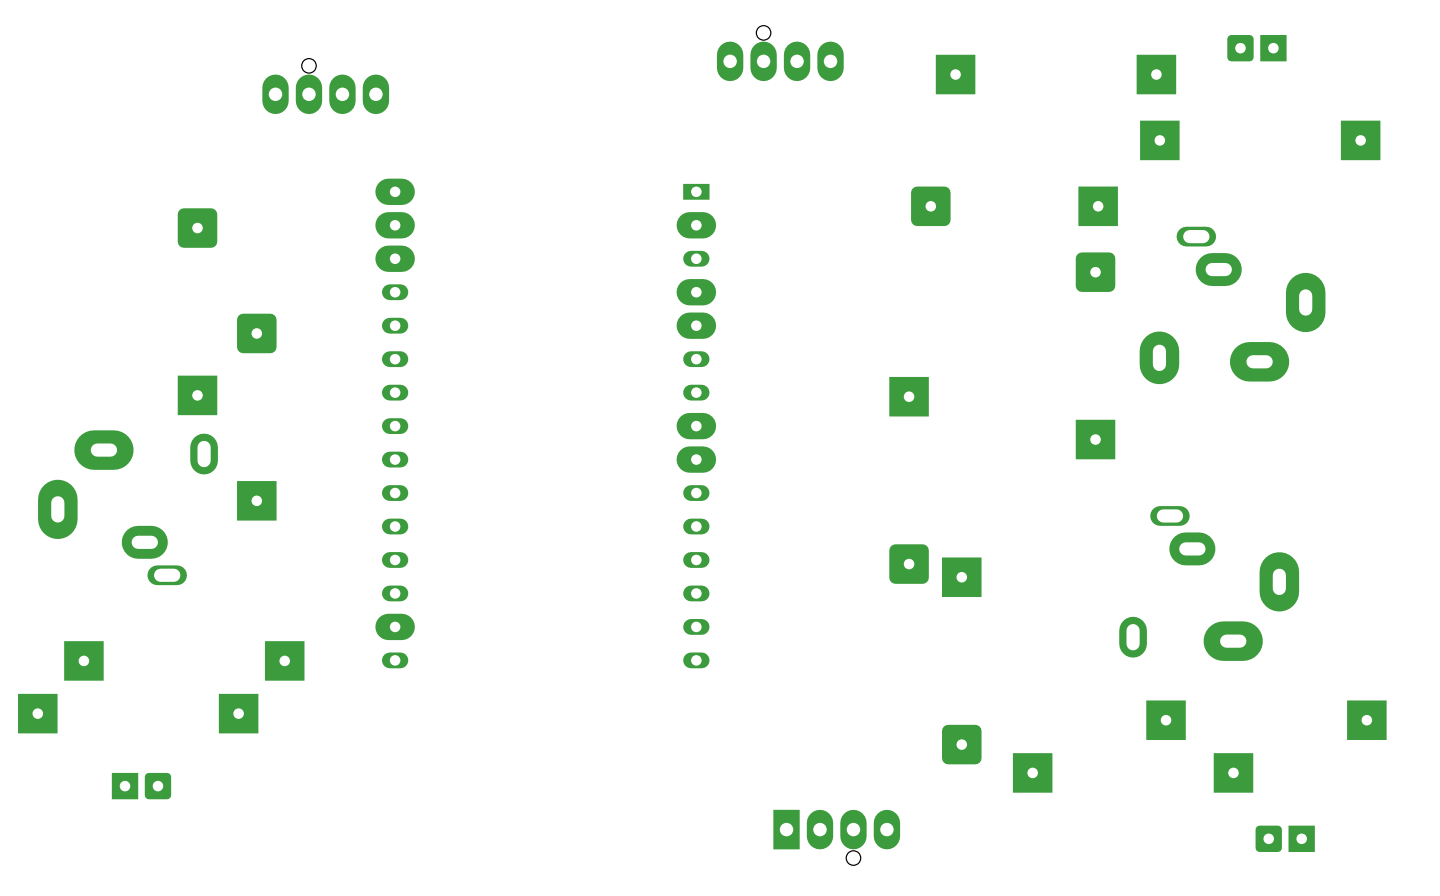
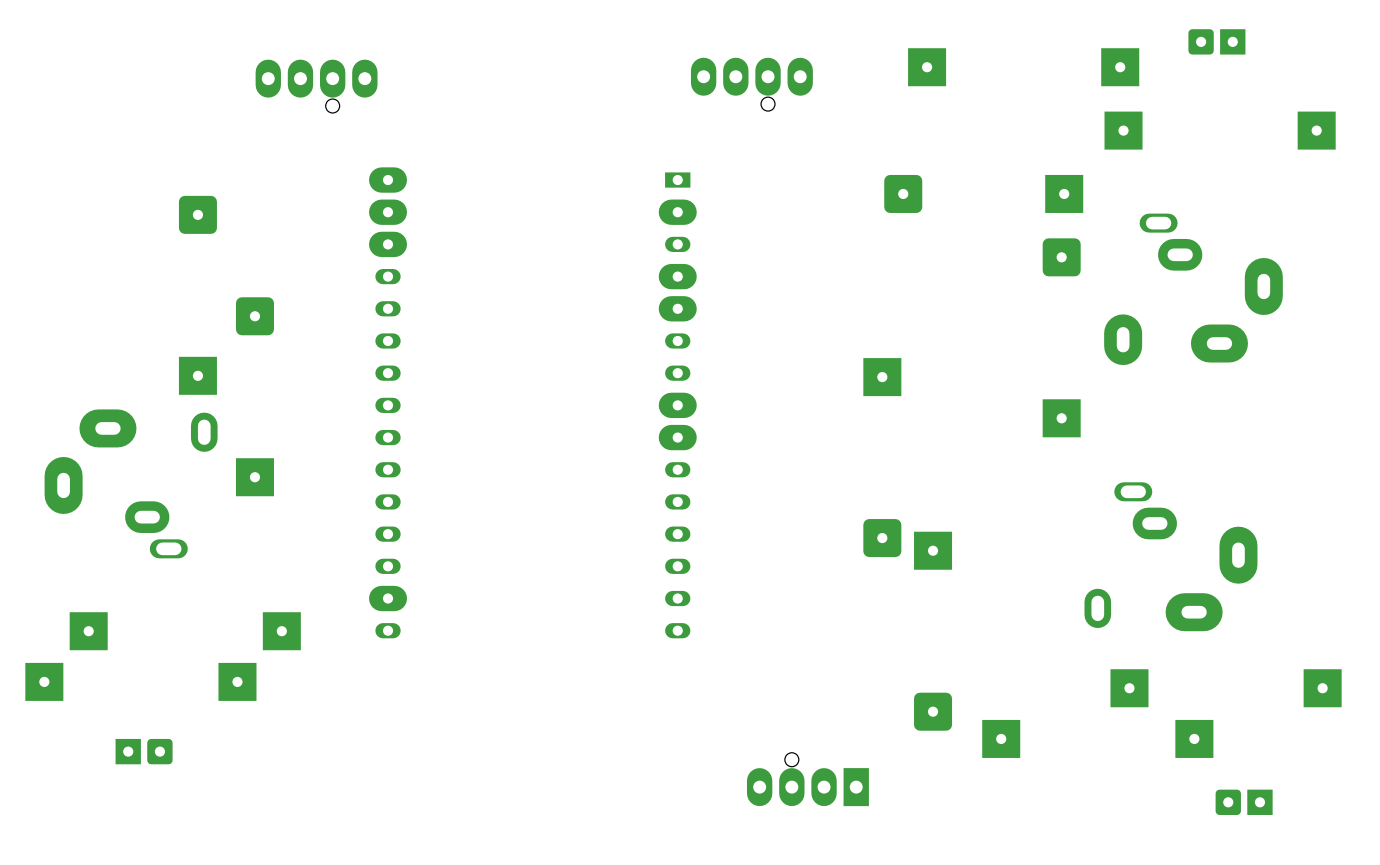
part rotation: 0° (780, 53) -> 180° (751, 84)
part rotation: 0° (325, 86) -> 180° (316, 86)
part rotation: 0° (836, 837) -> 180° (807, 779)

